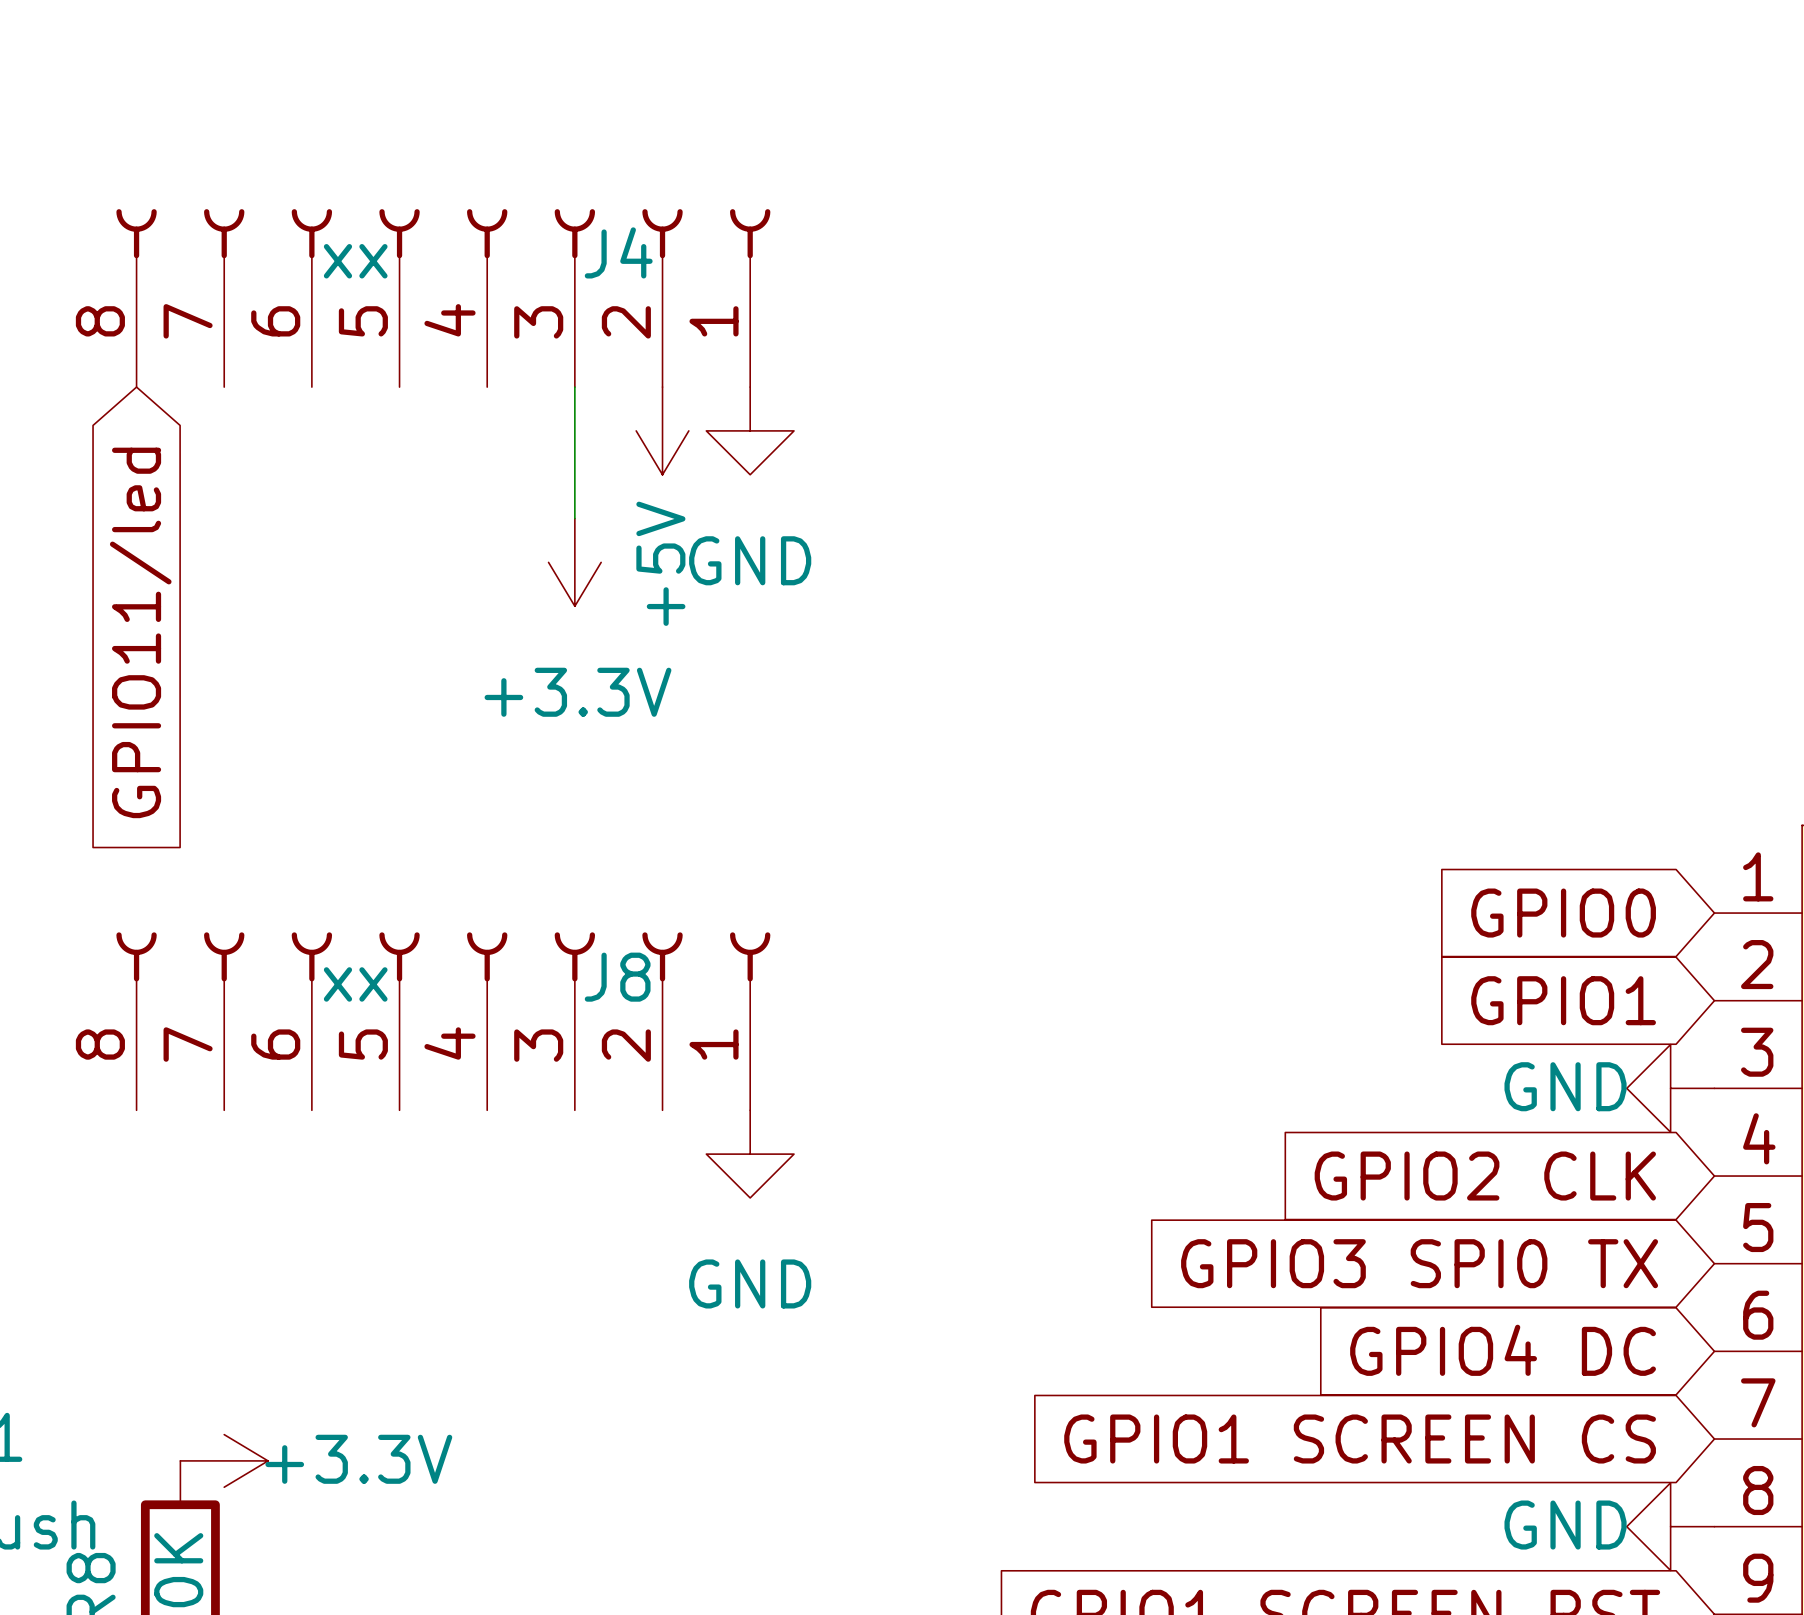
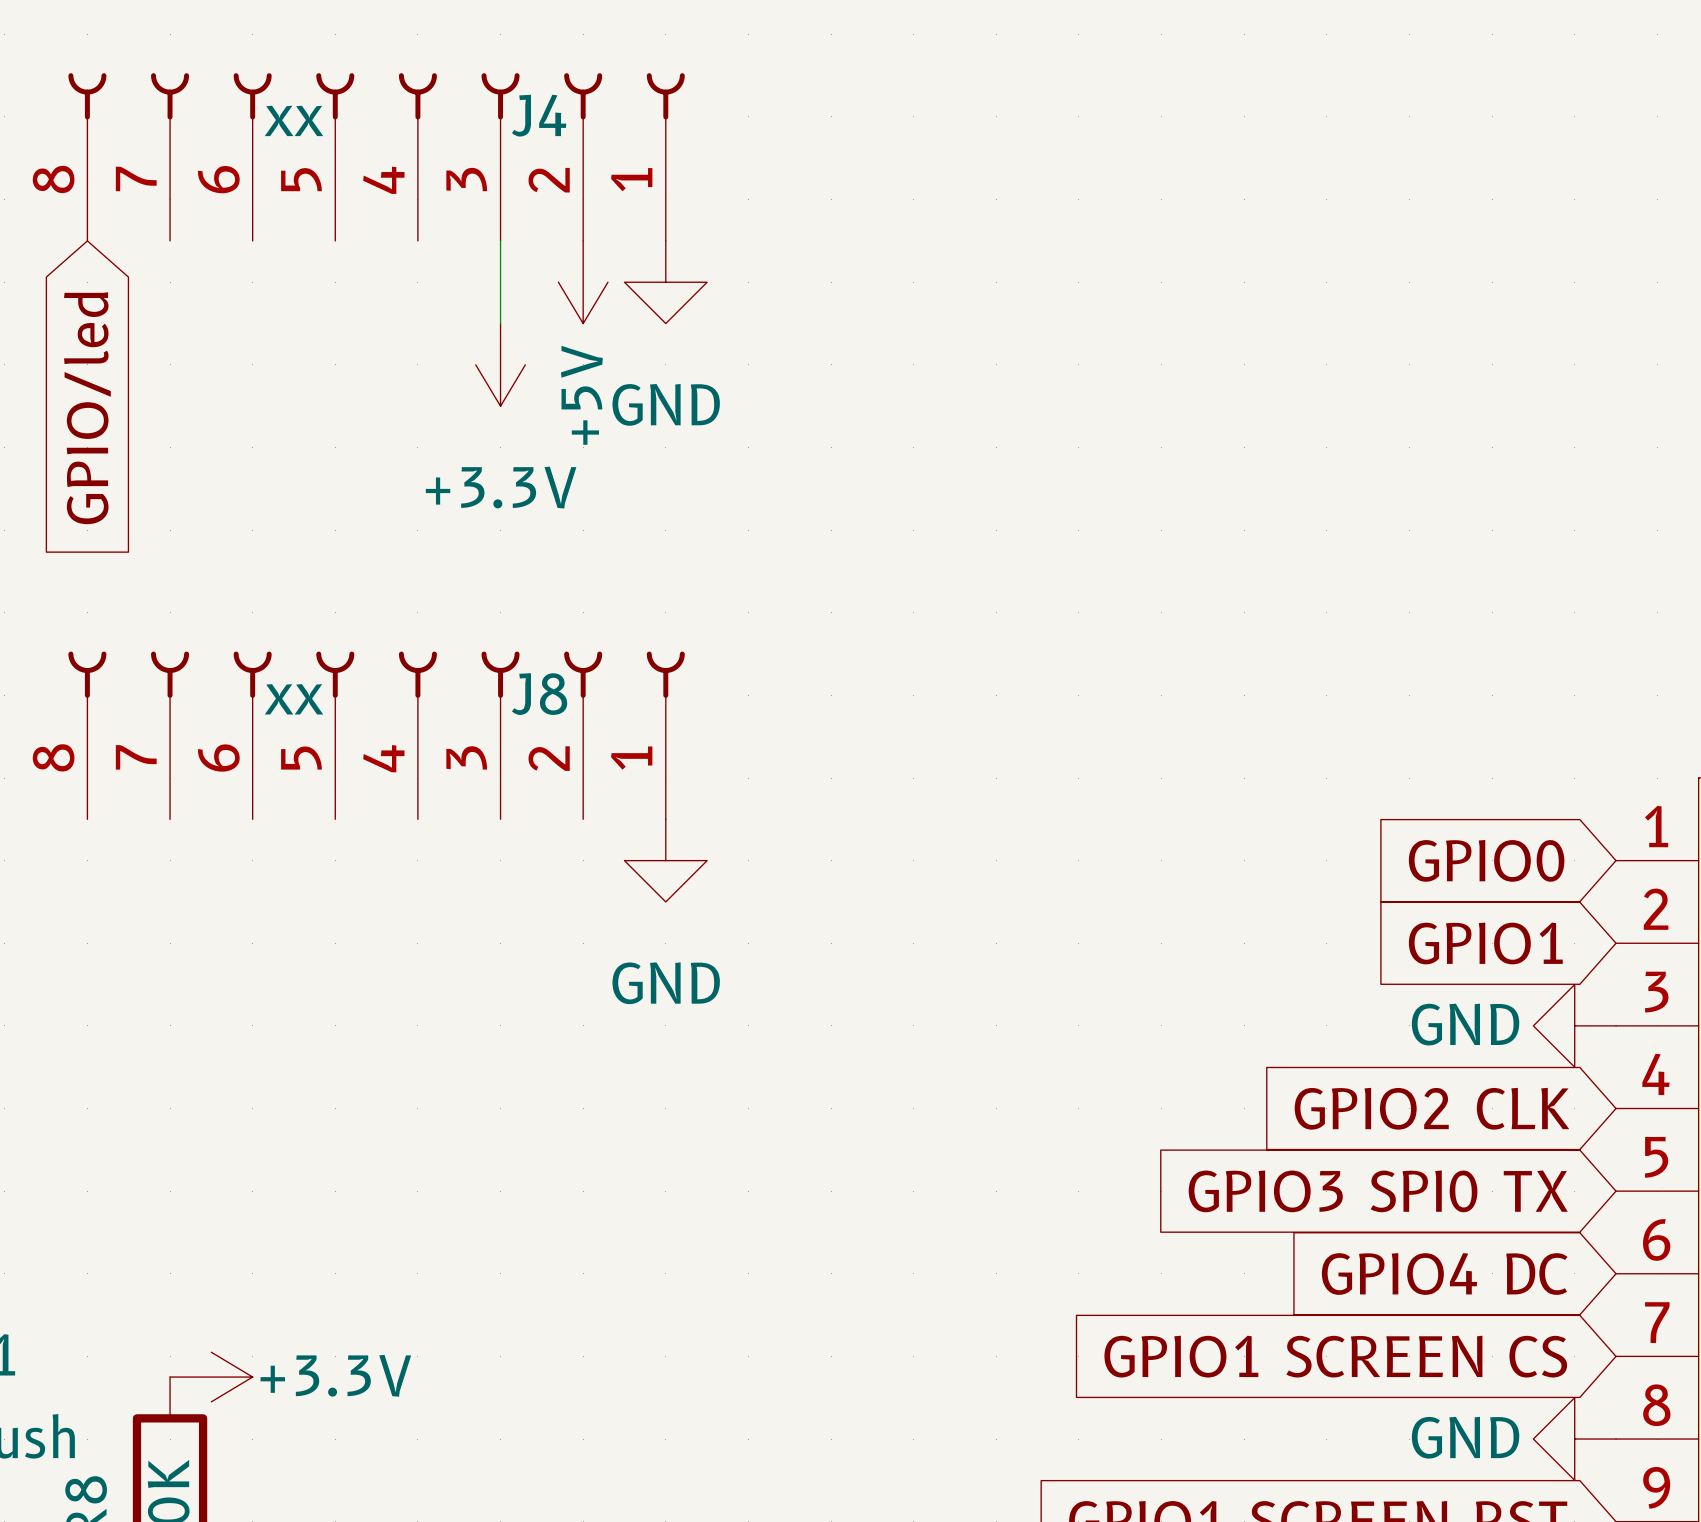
wire: none -> (500, 240) (500, 323)
J4 position: (443, 298) -> (376, 157)
wire: (574, 387) (574, 518) -> none
power symbol position: +5V (662, 430) -> +5V (583, 282)
power symbol position: GND (750, 430) -> GND (665, 282)
power symbol position: +3.3V (574, 562) -> +3.3V (500, 364)
global label: GPIO11/led (140, 632) -> GPIO/led (87, 408)
power symbol: none -> GND (665, 860)
J8 position: (443, 1021) -> (376, 735)
power symbol: GND (750, 1154) -> none

